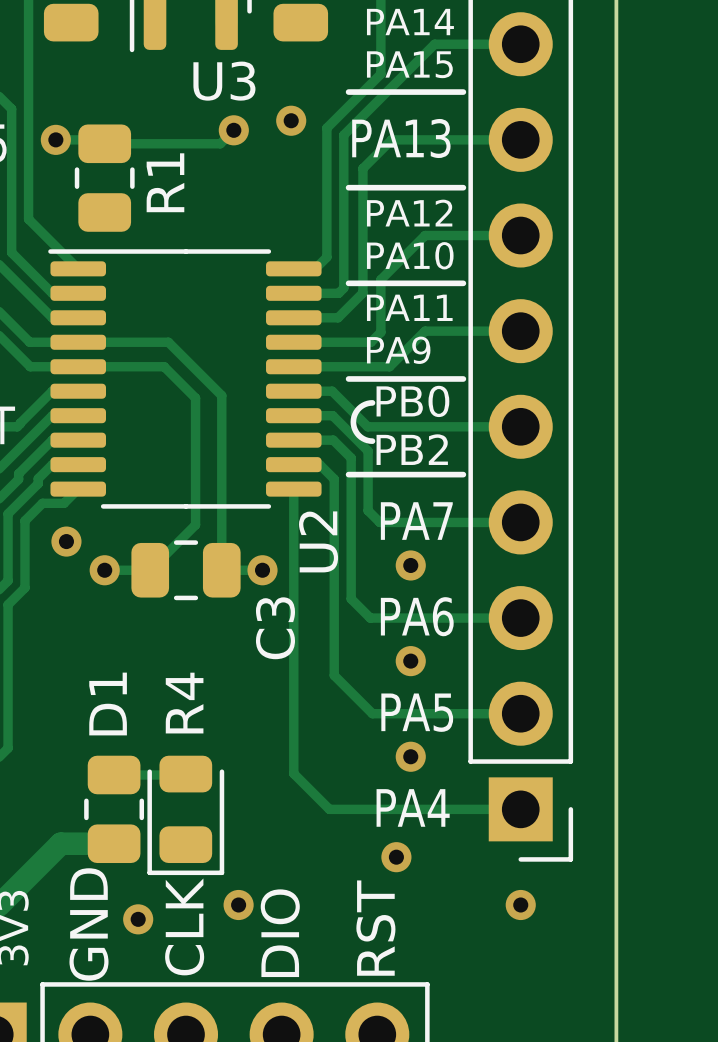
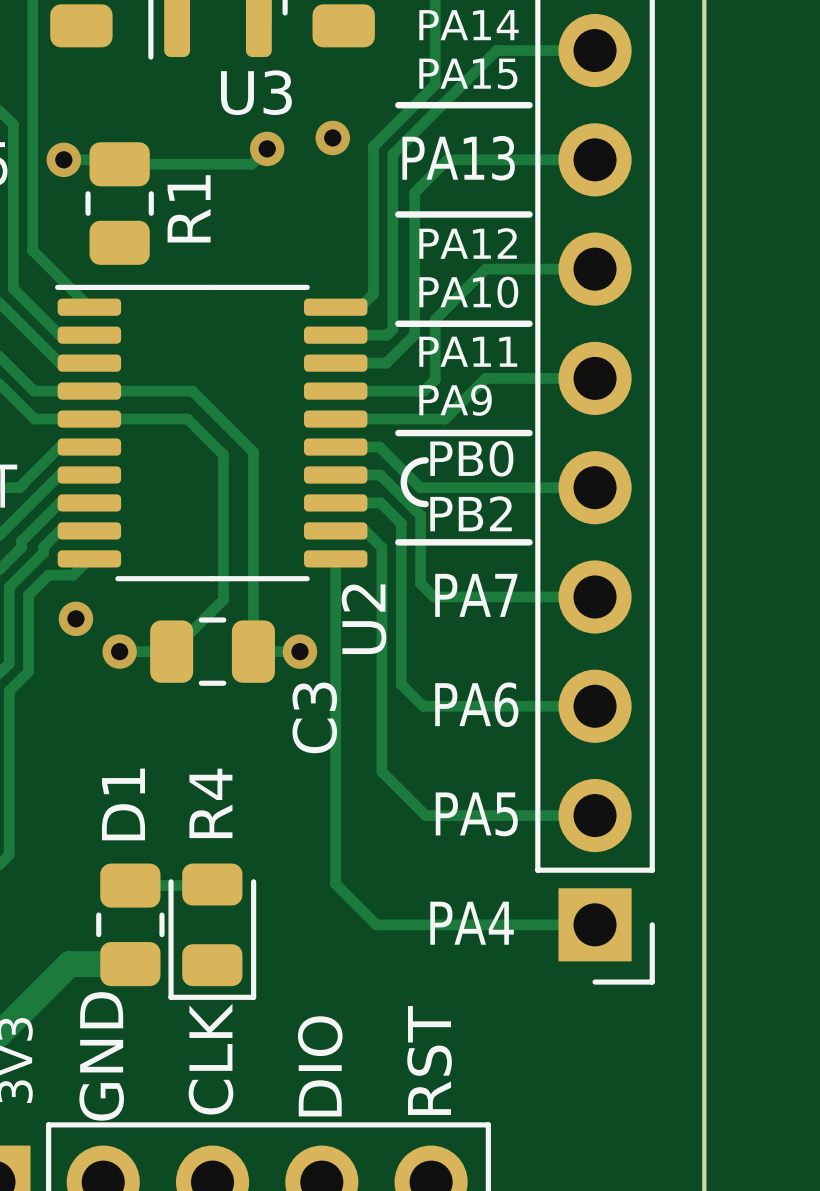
via: (410, 565) -> none
via: (410, 661) -> none
via: (410, 756) -> none
via: (396, 857) -> none
via: (238, 905) -> none
via: (520, 905) -> none
via: (138, 919) -> none

